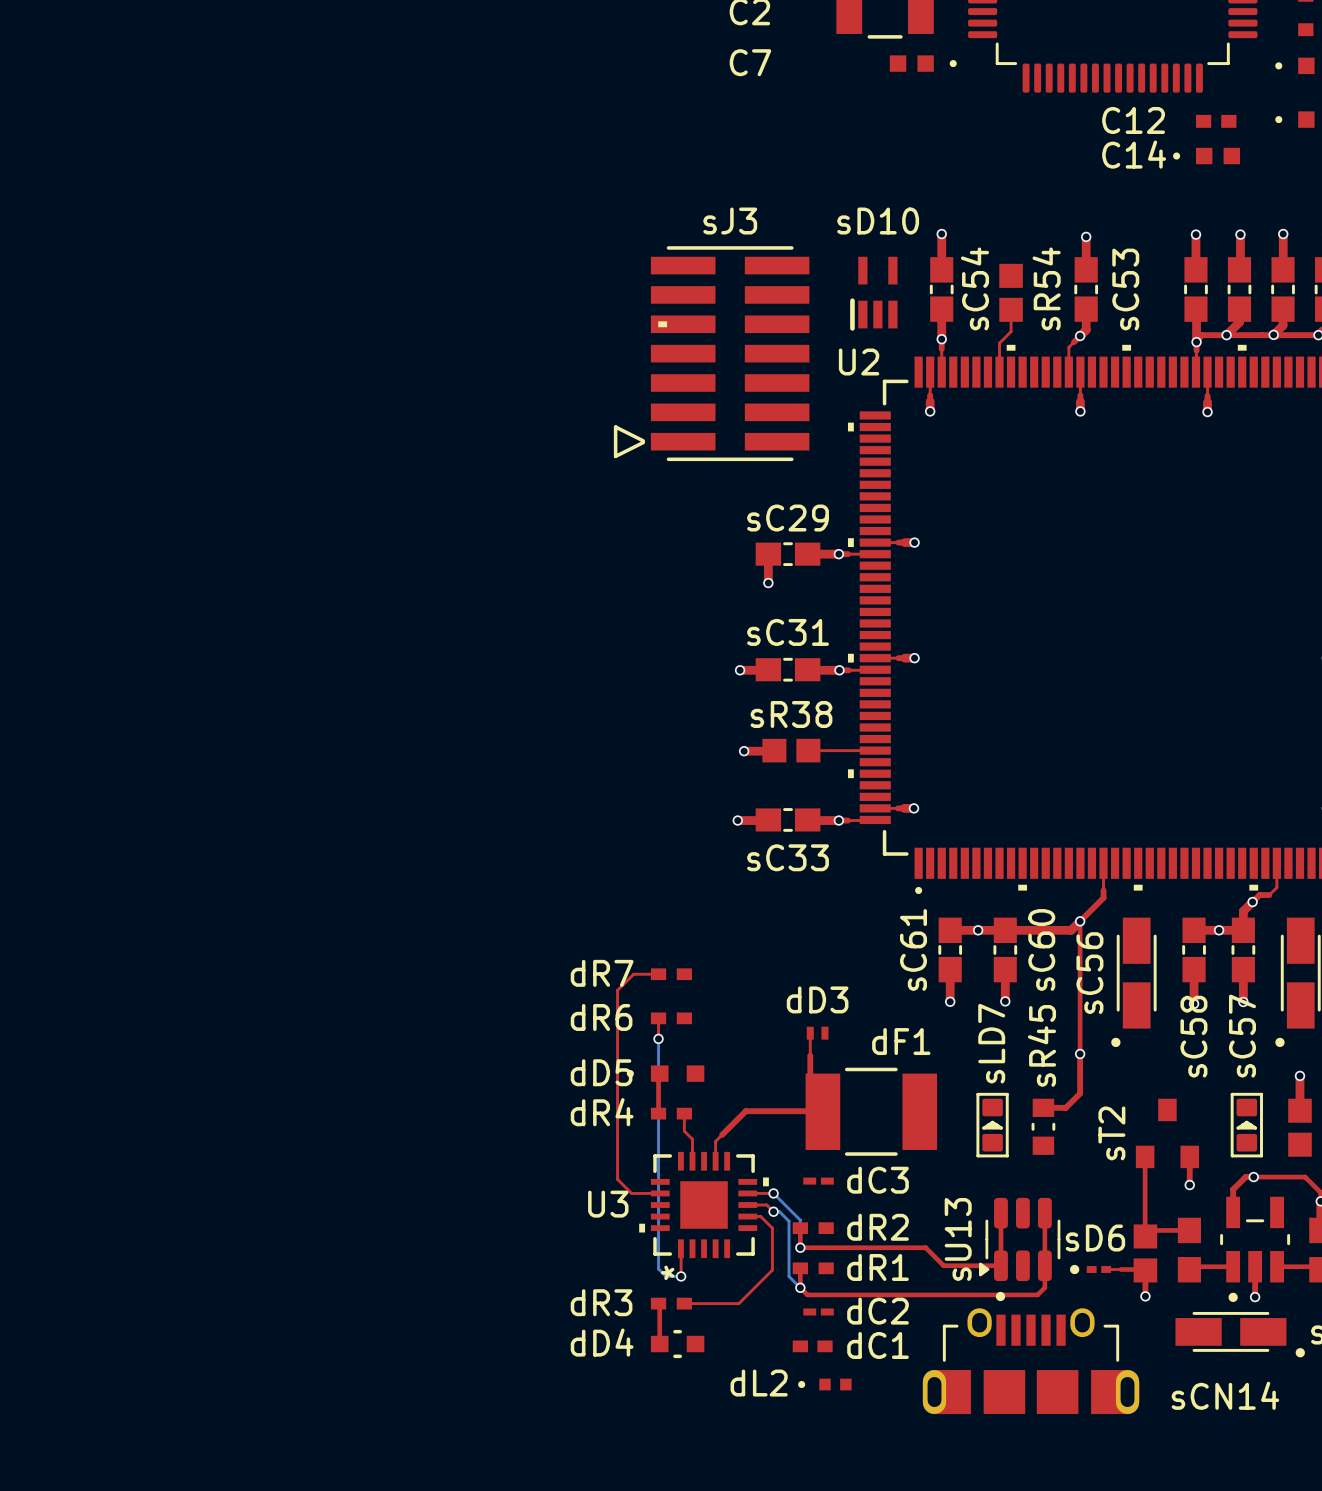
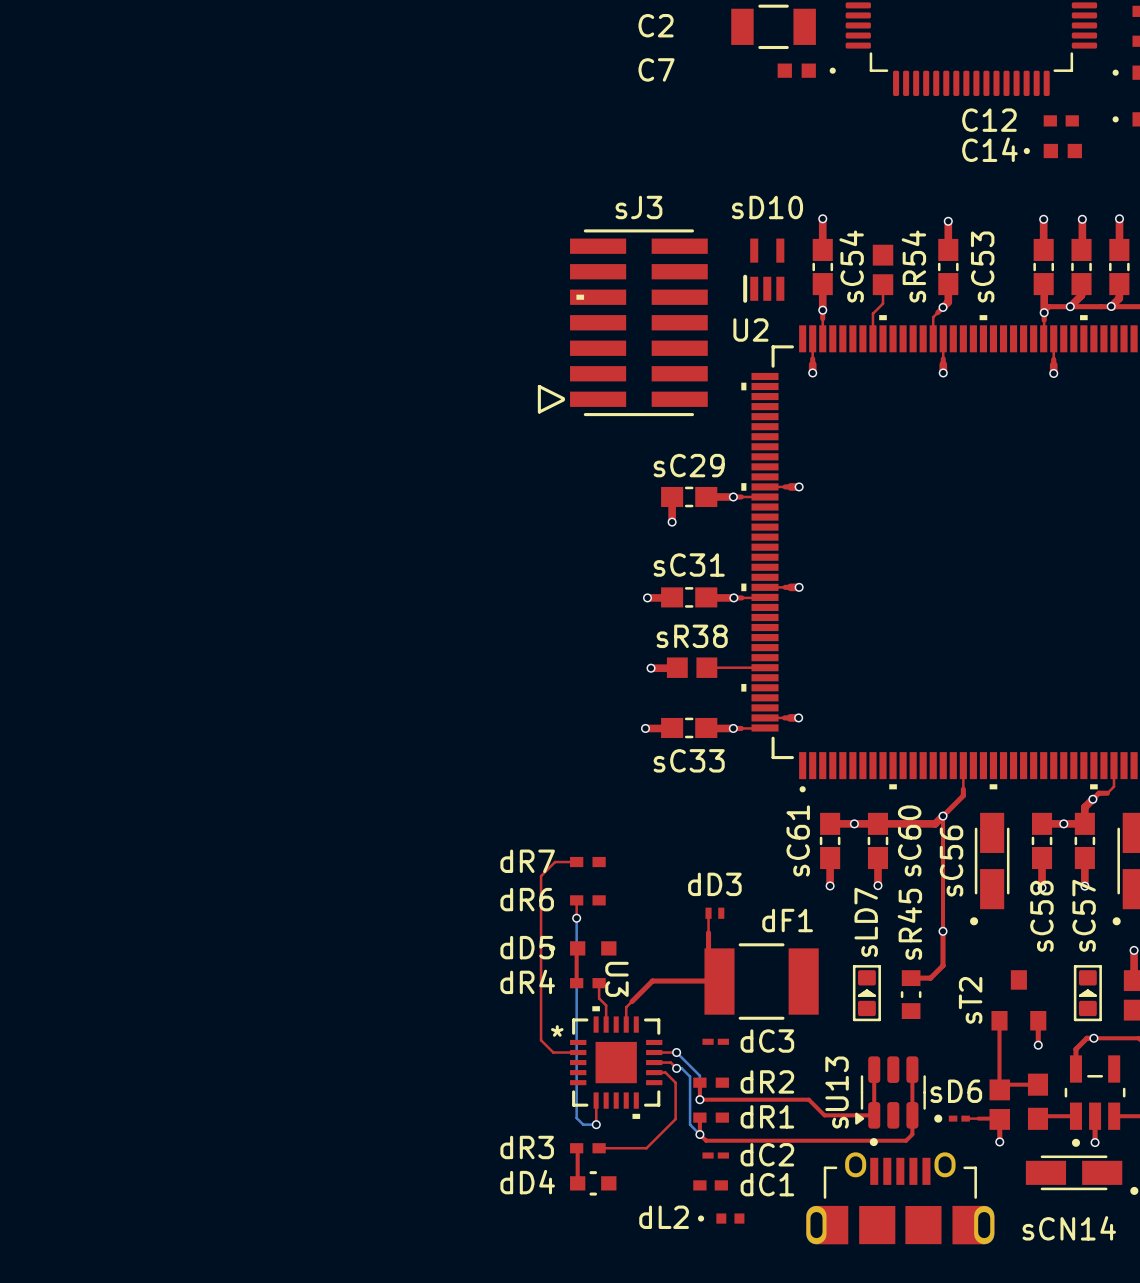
U3 rotation: 0° (704, 1205) -> 90° clockwise (616, 1062)

